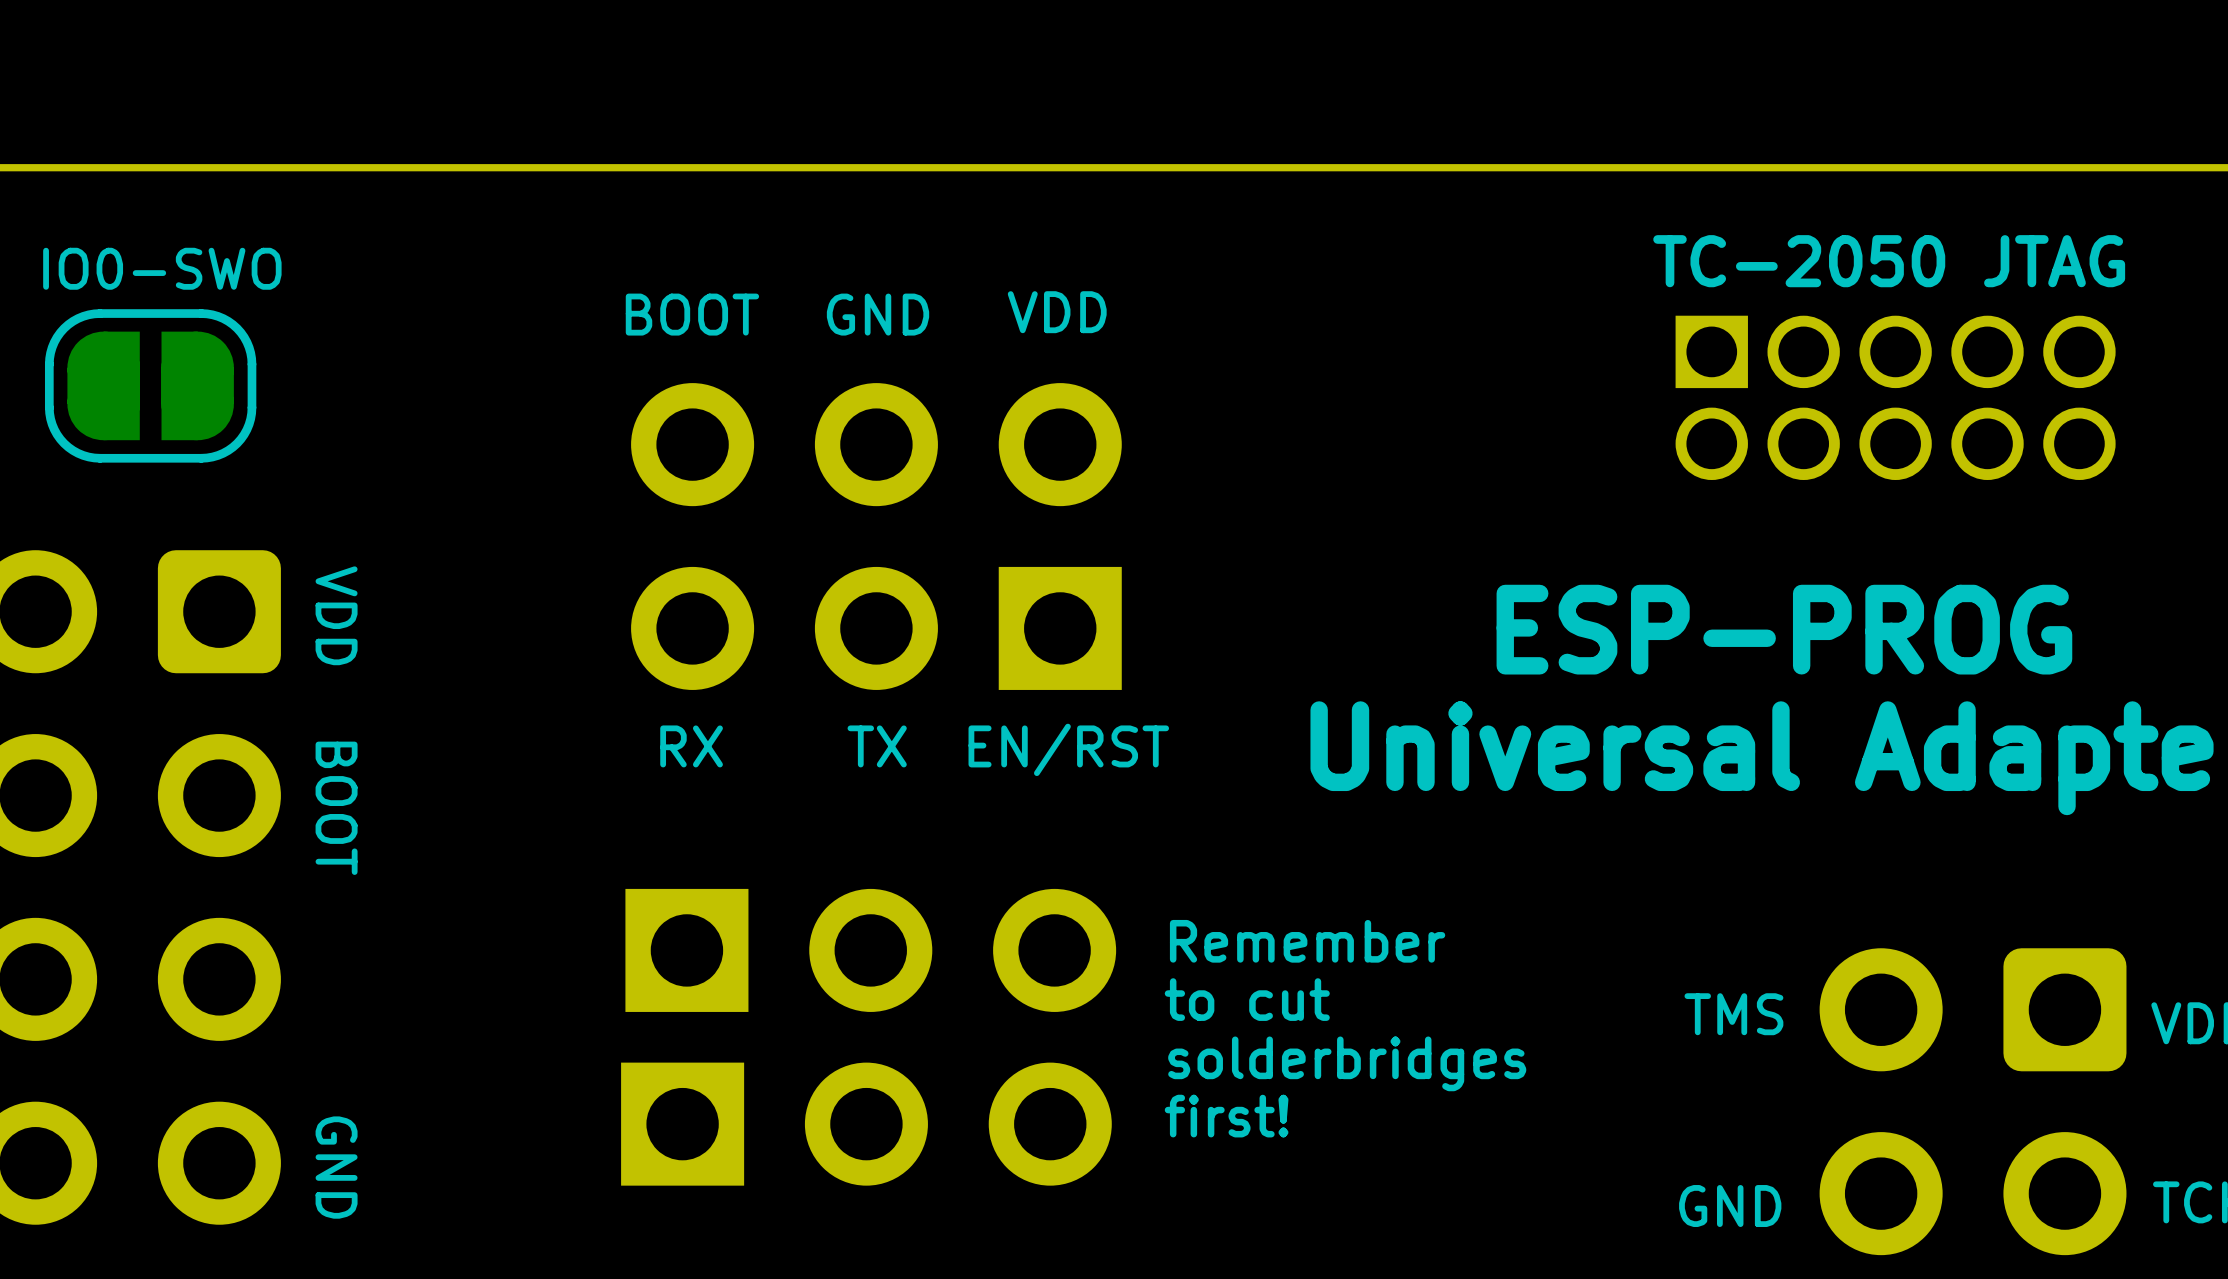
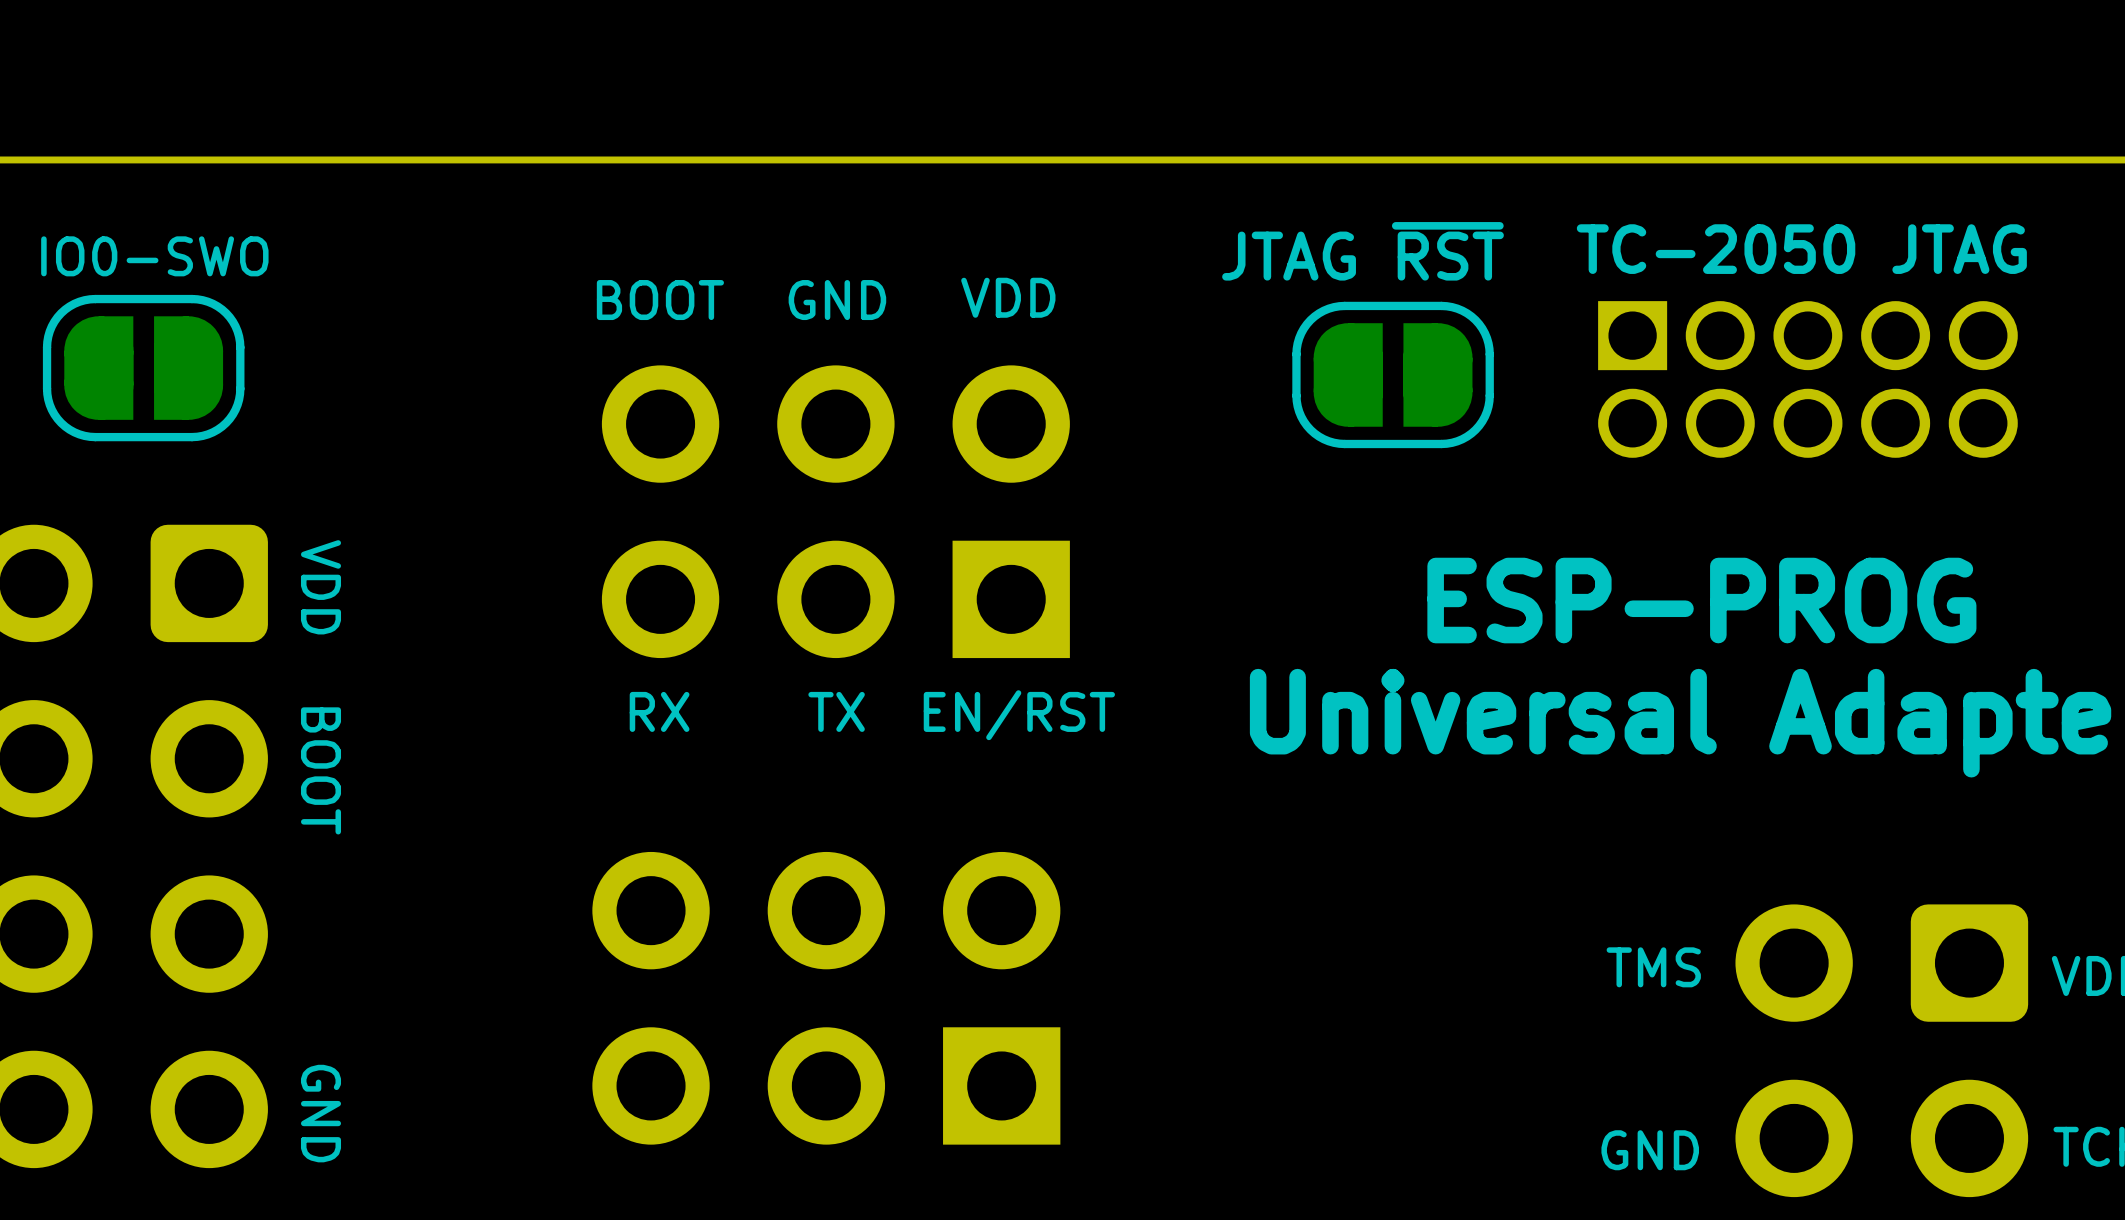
part: none -> JTAG ~{RST} (1393, 374)
text: Remember (1307, 941) -> none
part: (870, 950) -> none
text: to cut (1247, 999) -> none
part: none -> (826, 998)
text: solderbridges (1347, 1063) -> none
text: first! (1226, 1116) -> none
part: (866, 1124) -> none

